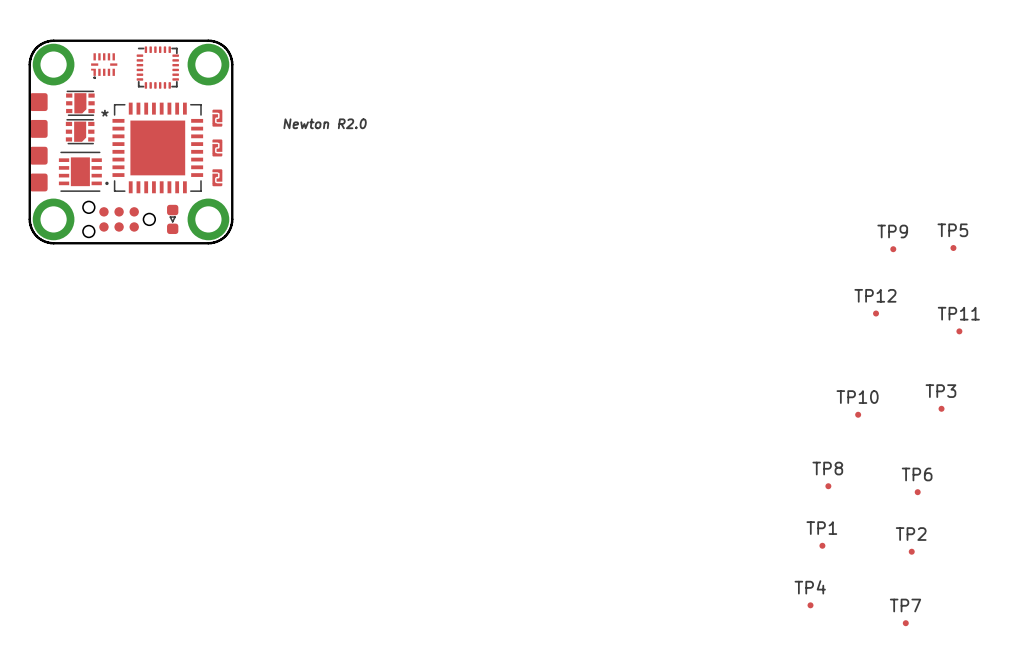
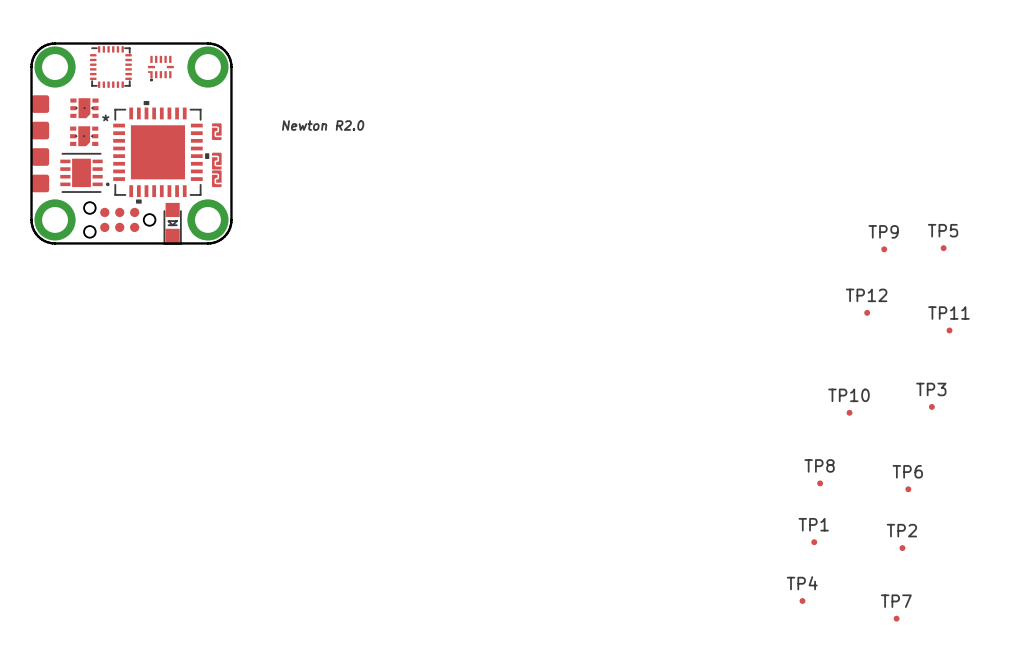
part footprint: [136, 46, 179, 89] -> [147, 55, 174, 82]
part footprint: [91, 53, 118, 79] -> [90, 46, 132, 88]
part footprint: [66, 90, 95, 116] -> [70, 98, 99, 119]
part footprint: [112, 102, 204, 194] -> [113, 100, 210, 204]
part: (217, 118) -> none
part footprint: [65, 119, 95, 145] -> [70, 126, 99, 147]
part: none -> (216, 131)
part: (217, 147) -> none
part: none -> (216, 161)
part footprint: [167, 204, 179, 235] -> [163, 202, 182, 245]

